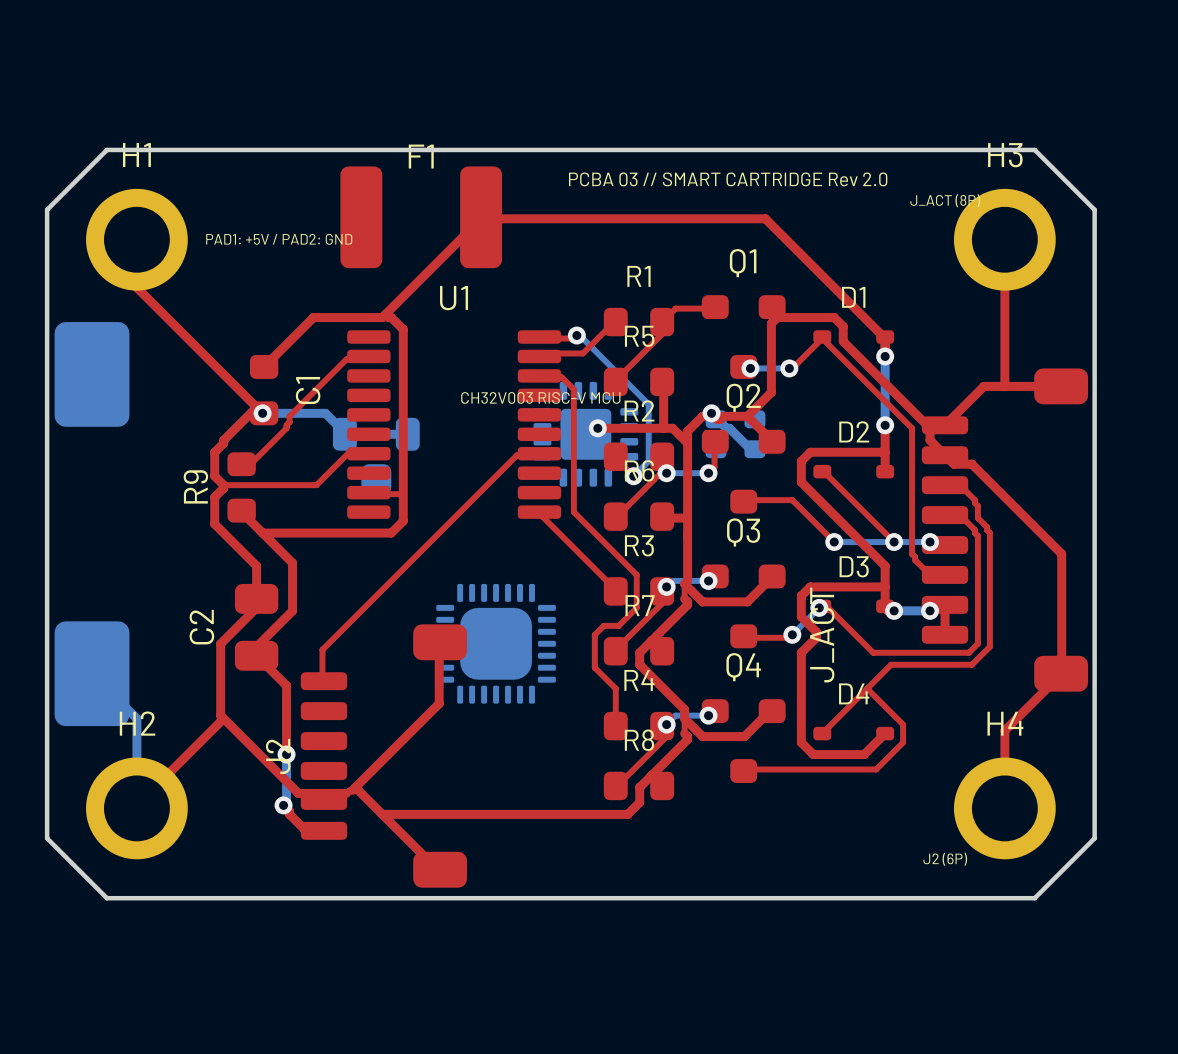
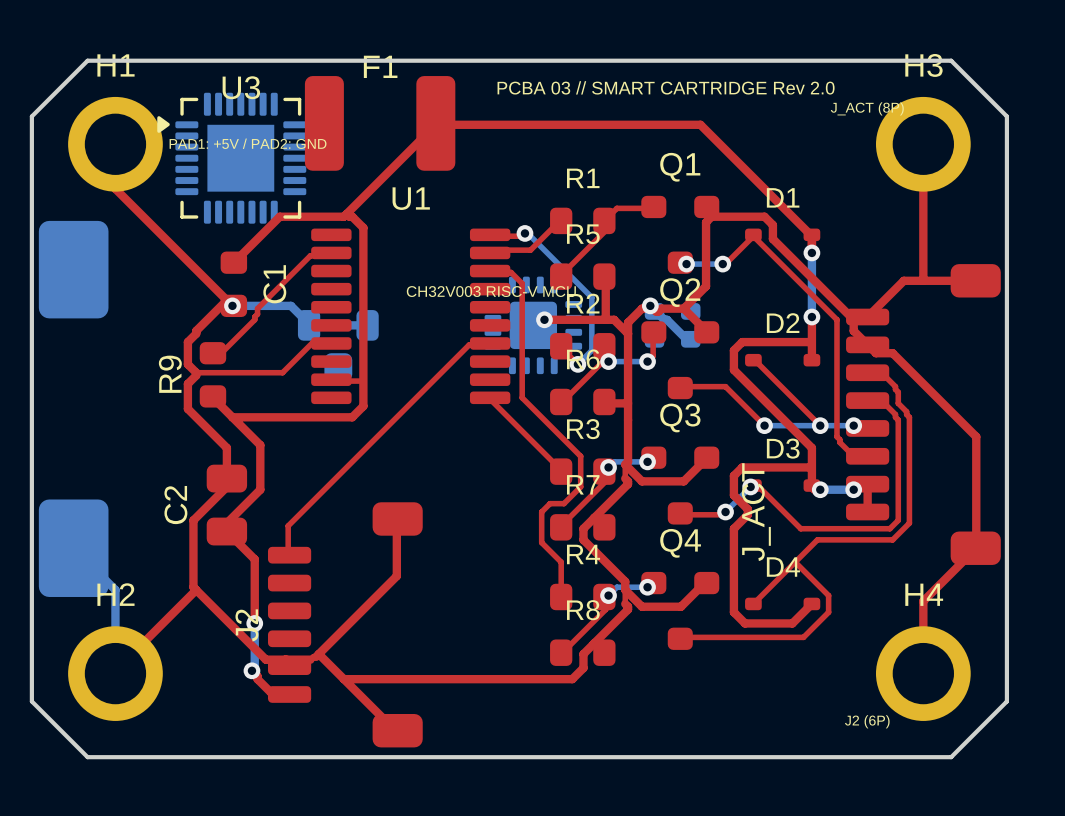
U3: none -> (231, 158)
part: (496, 643) -> none

